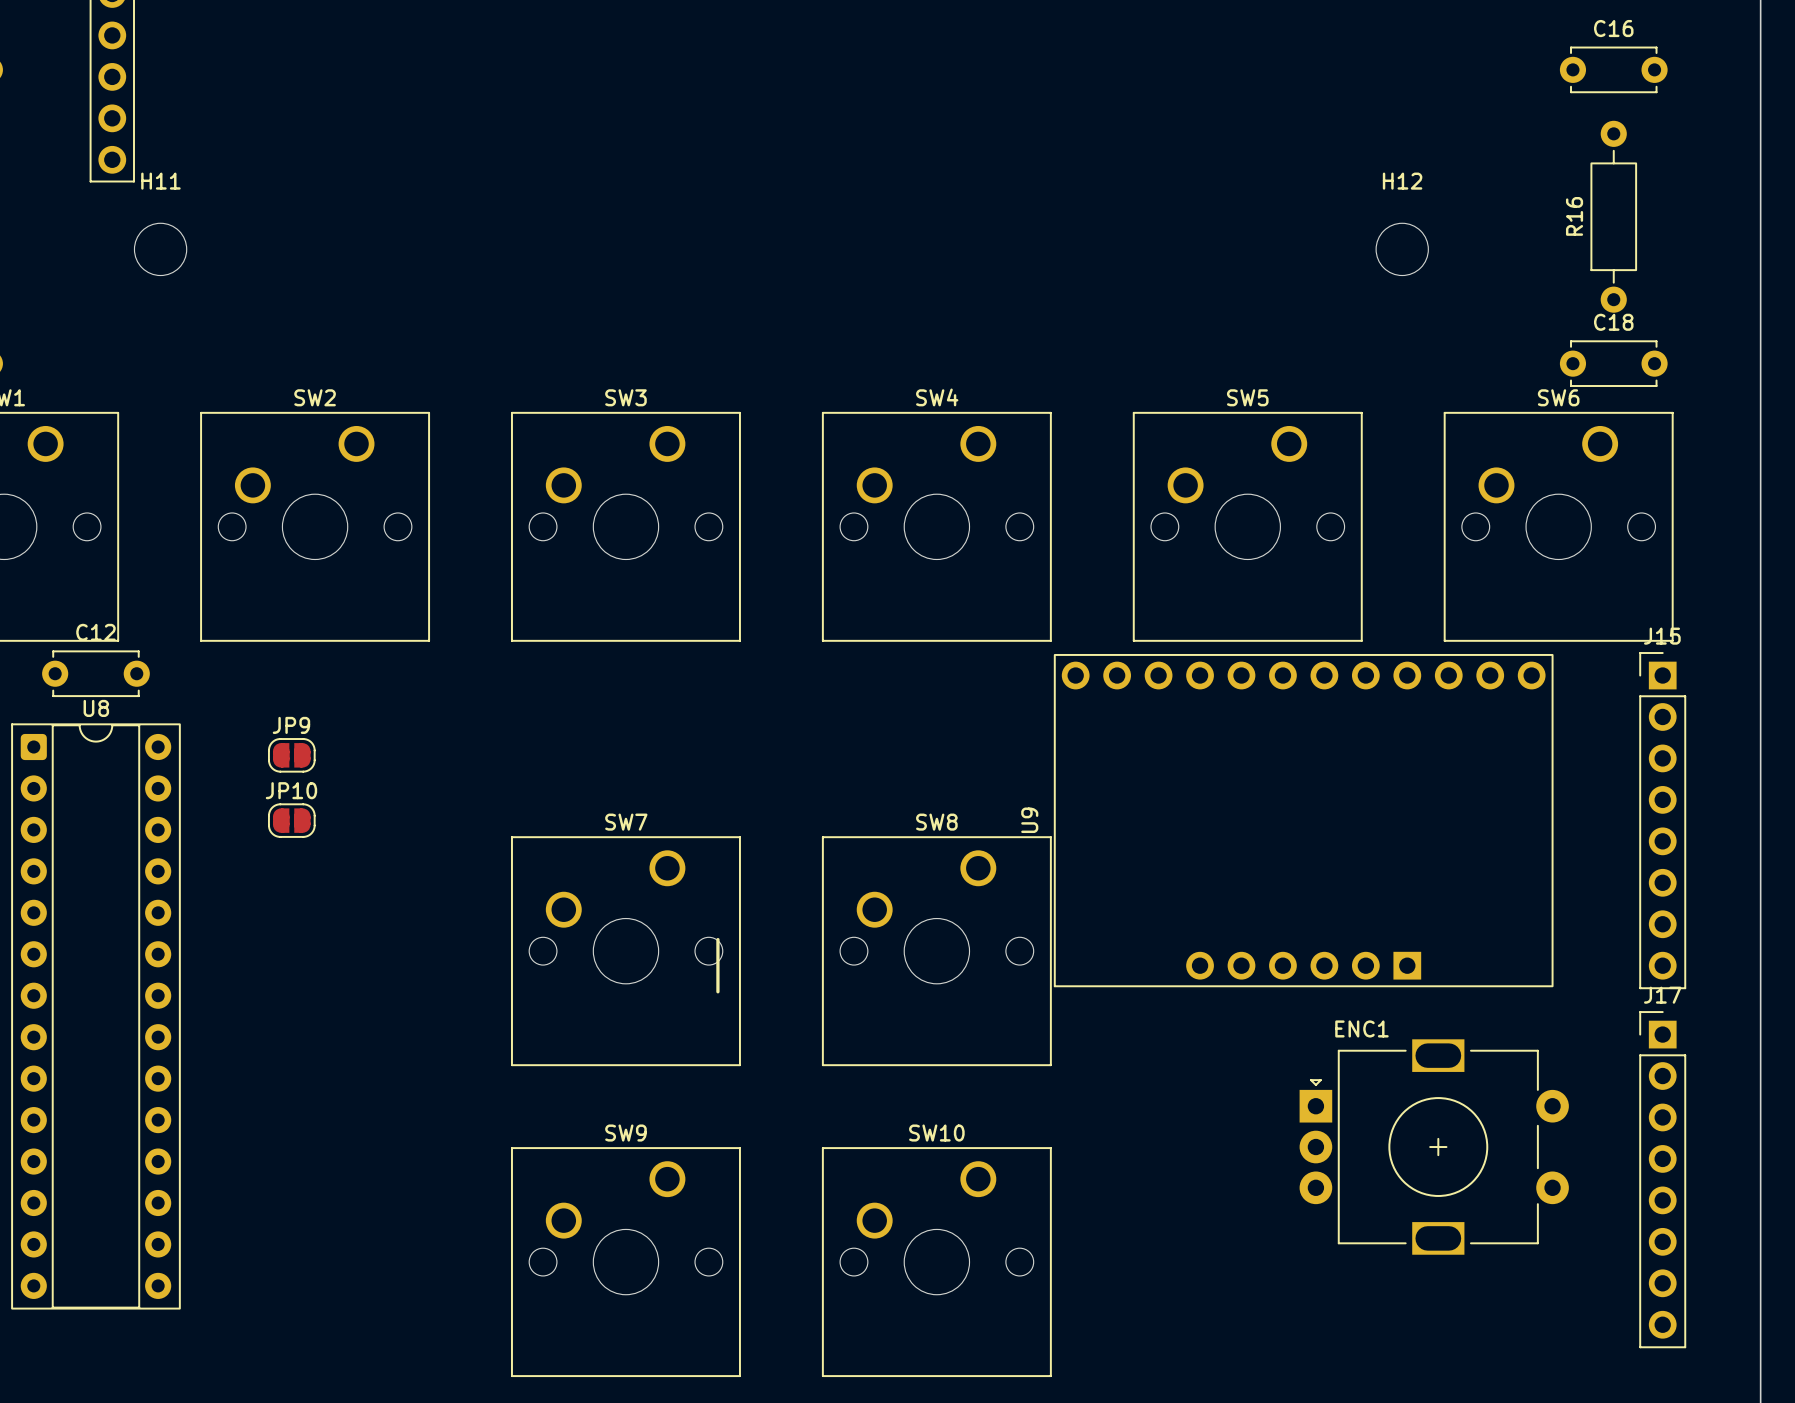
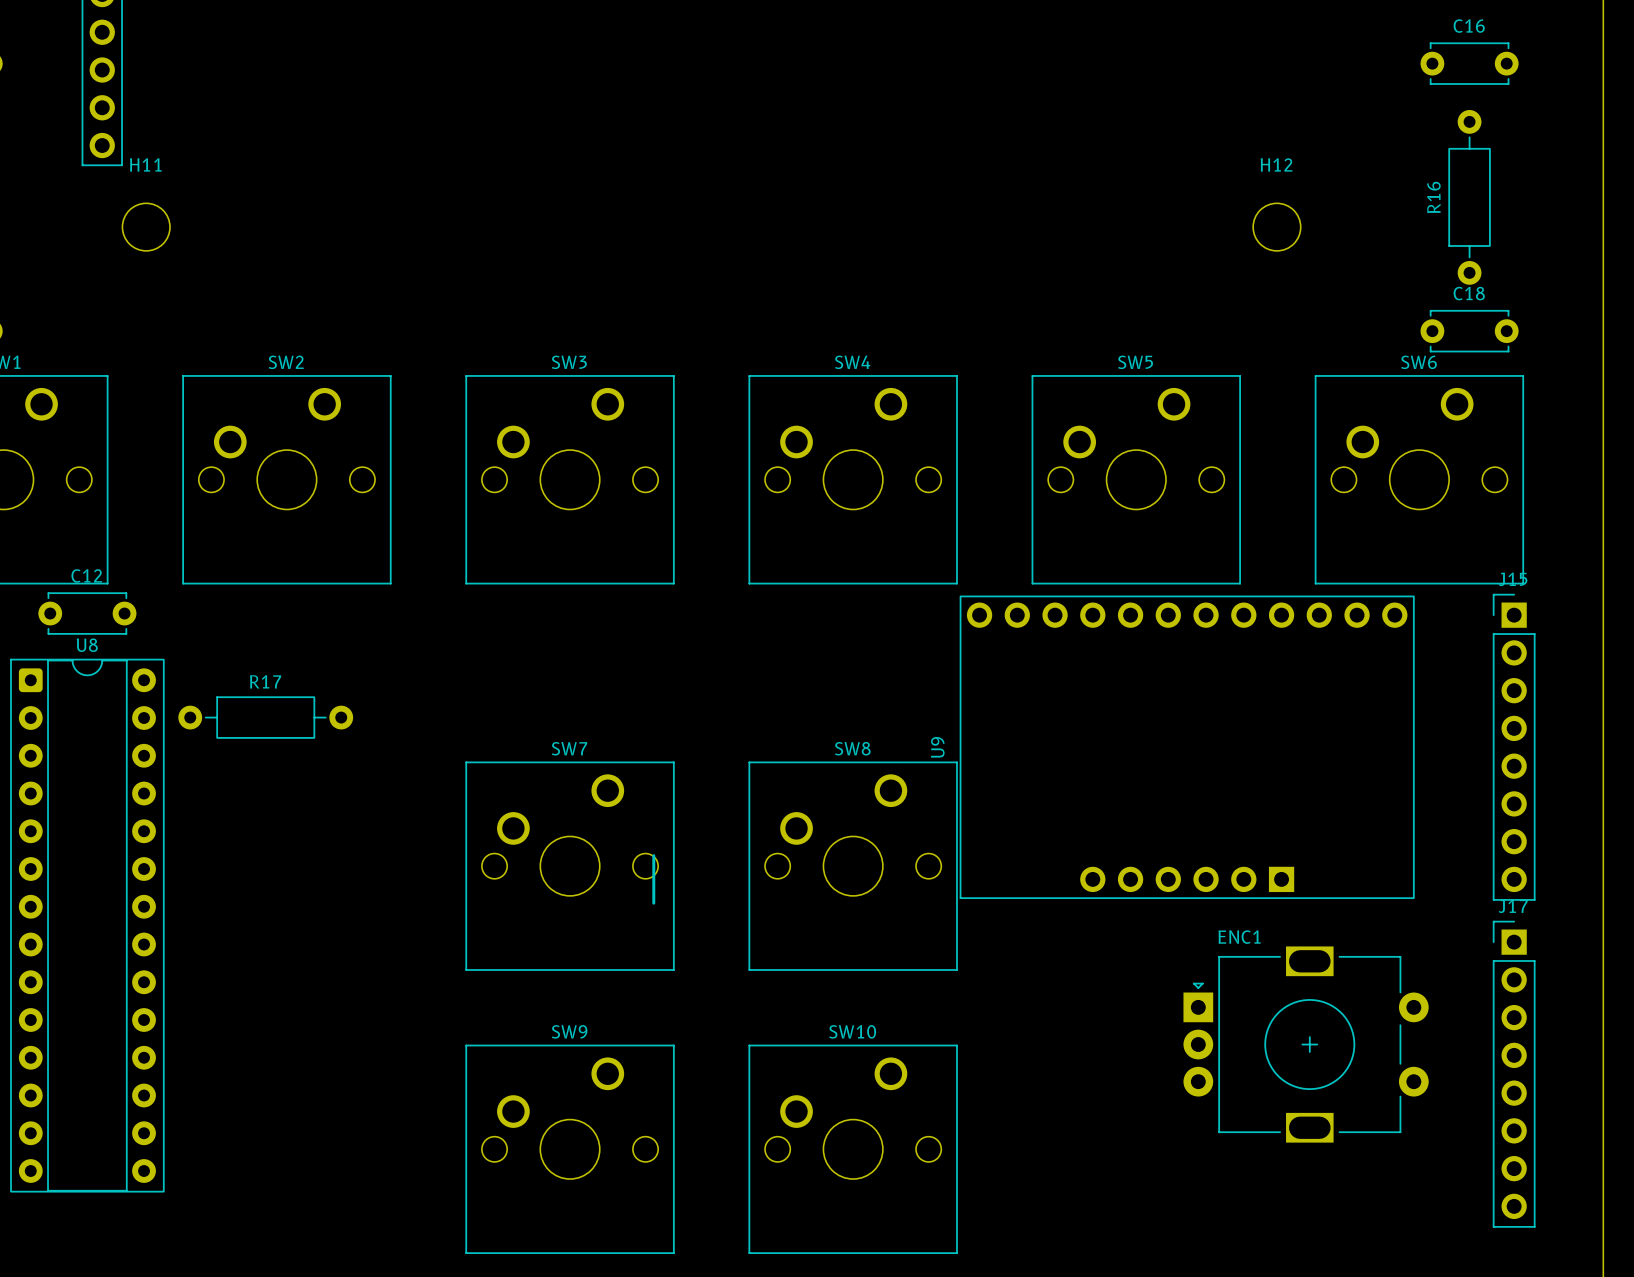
JP9: (291, 755) -> none
R17: none -> (265, 717)
JP10: (291, 820) -> none

